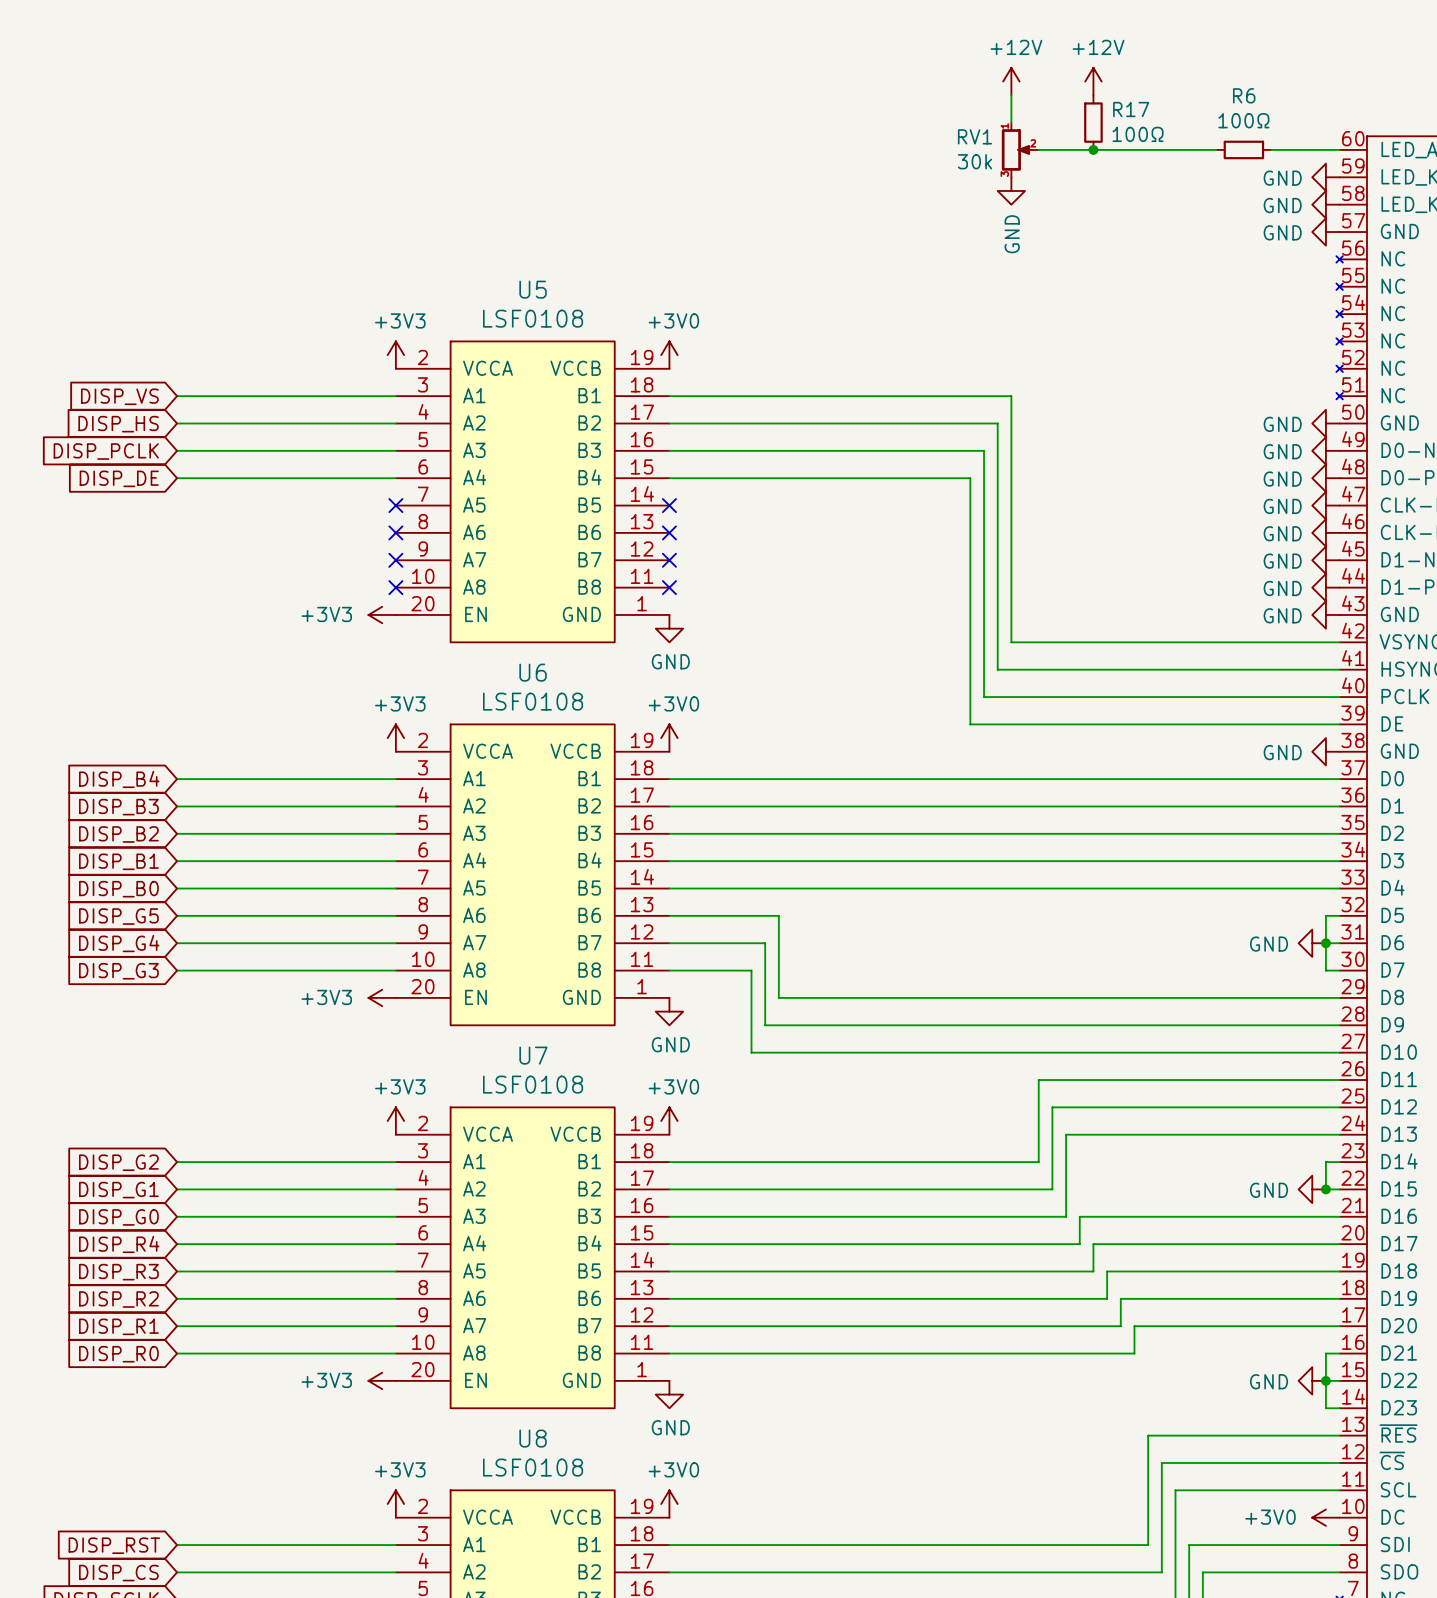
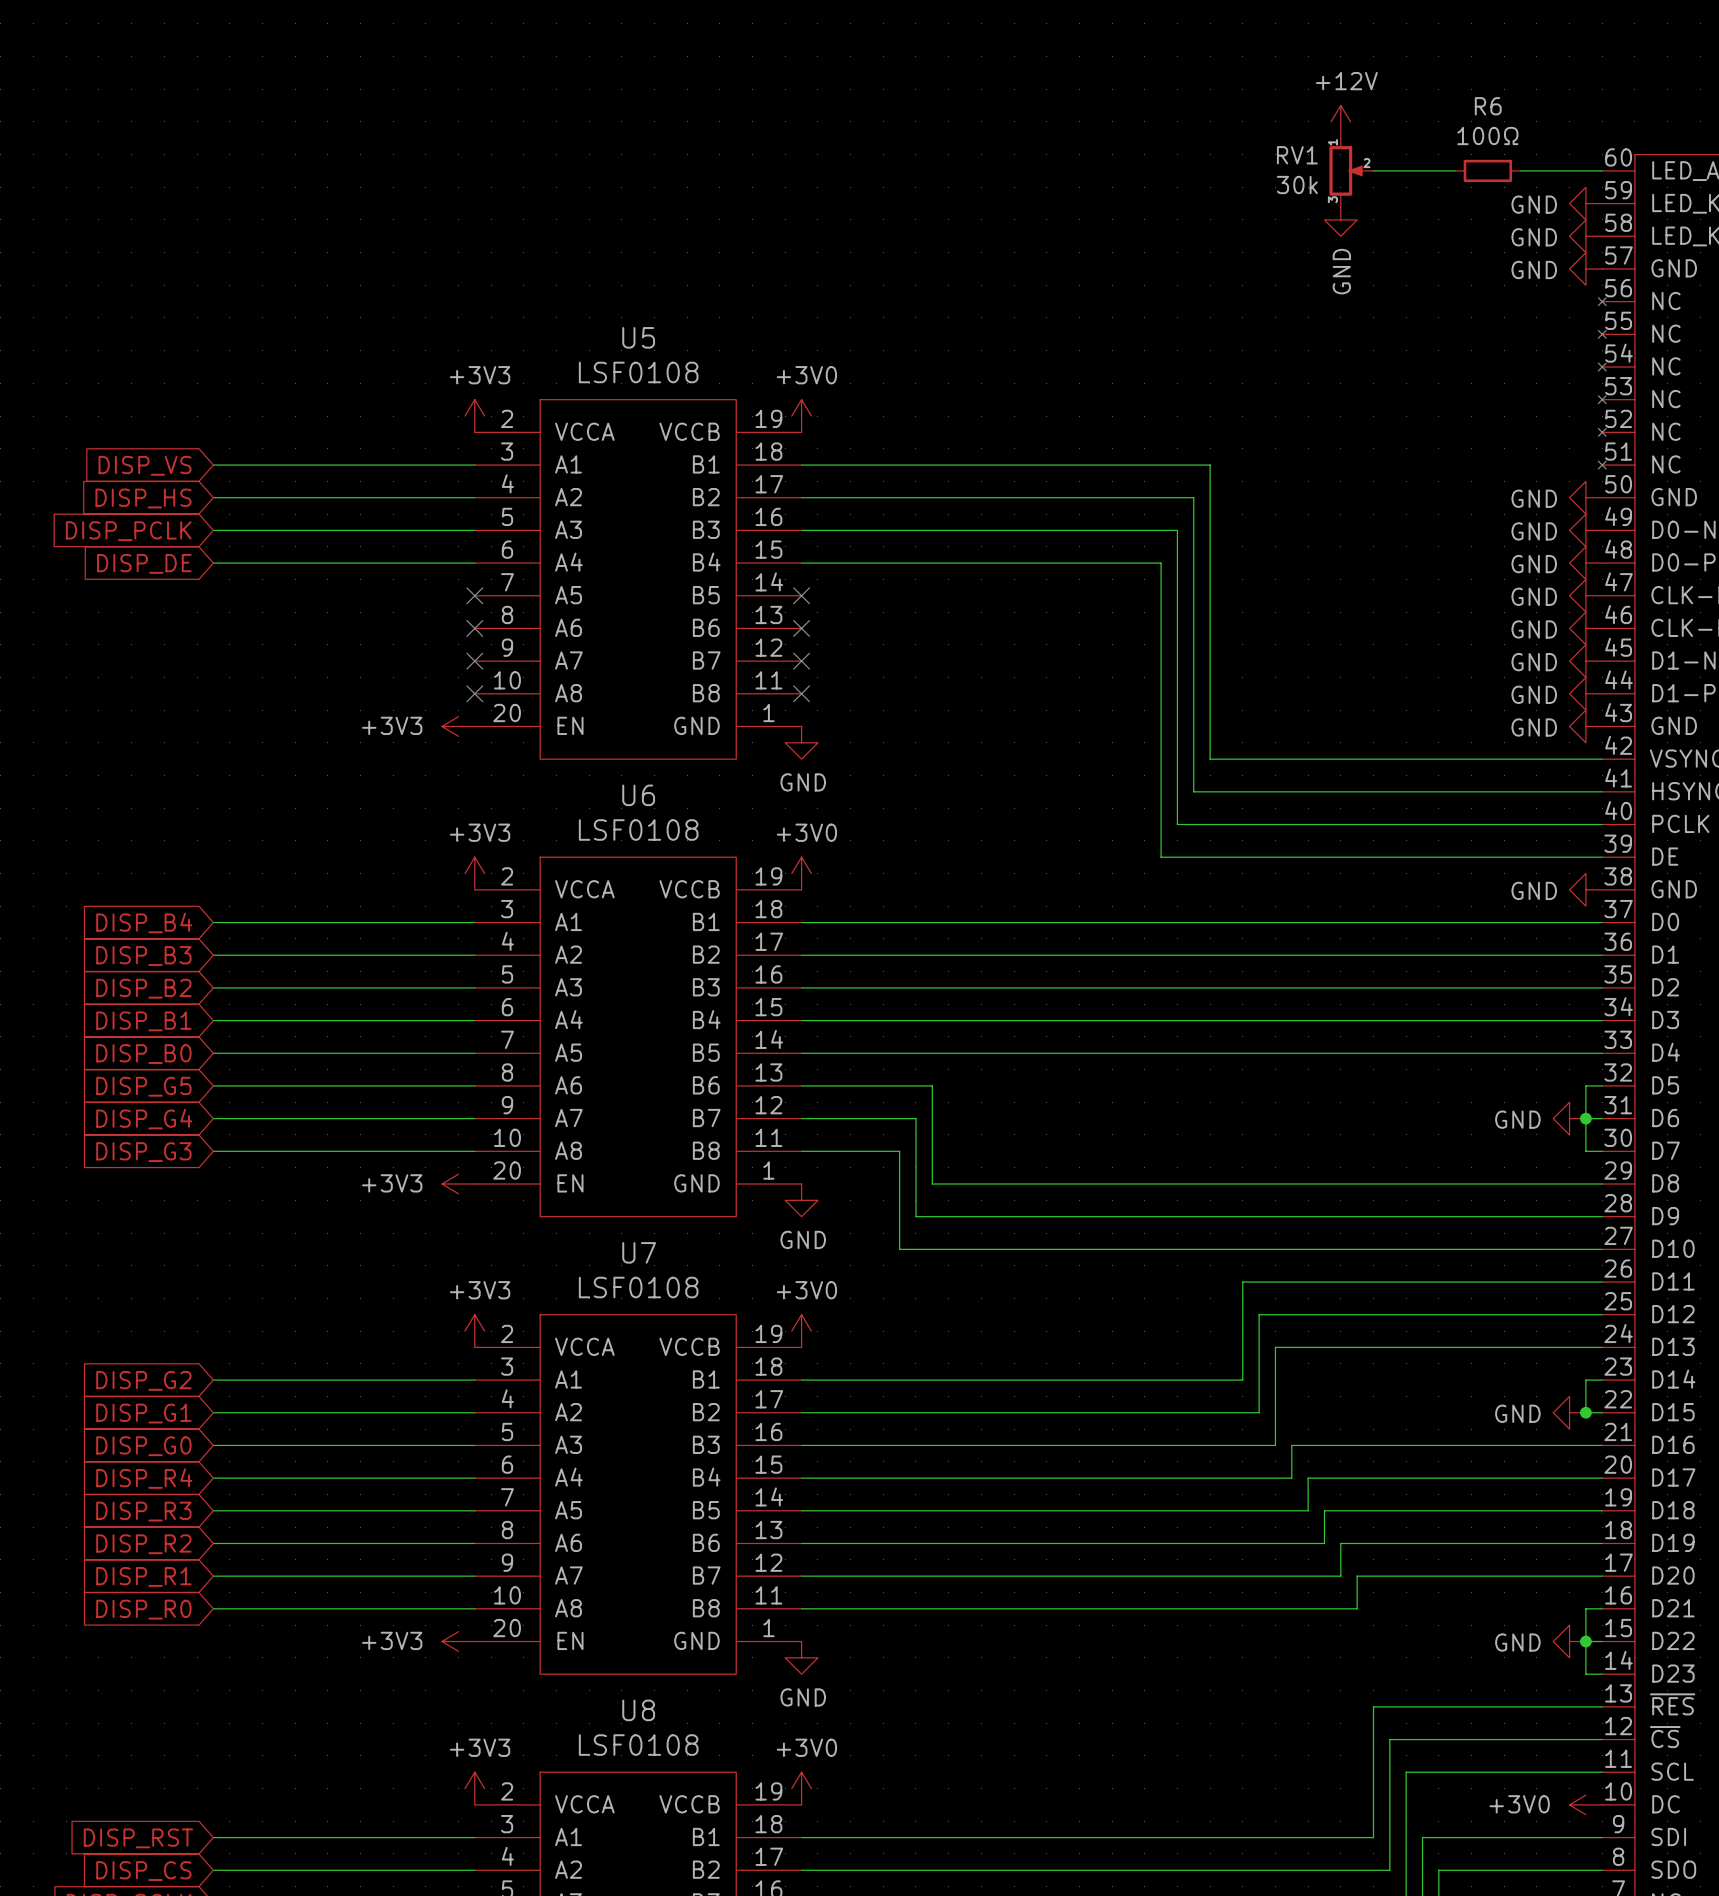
power symbol: +12V (1011, 81) -> none
power symbol position: +12V (1093, 81) -> +12V (1340, 121)
wire: (1011, 95) (1011, 122) -> none
R17: 100Ω (1093, 122) -> none
RV1 position: (1020, 149) -> (1351, 170)
wire: (1038, 149) (1148, 149) -> none
junction: (1093, 149) -> none
power symbol position: GND (1011, 190) -> GND (1340, 219)

